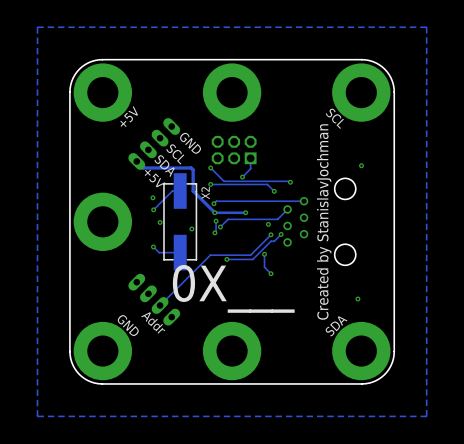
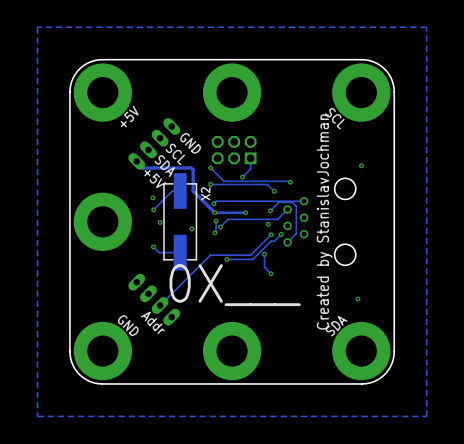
track: none -> (270, 210) (278, 202) (292, 202) (296, 206) (296, 233) (287, 242)
via: none -> (270, 210)

